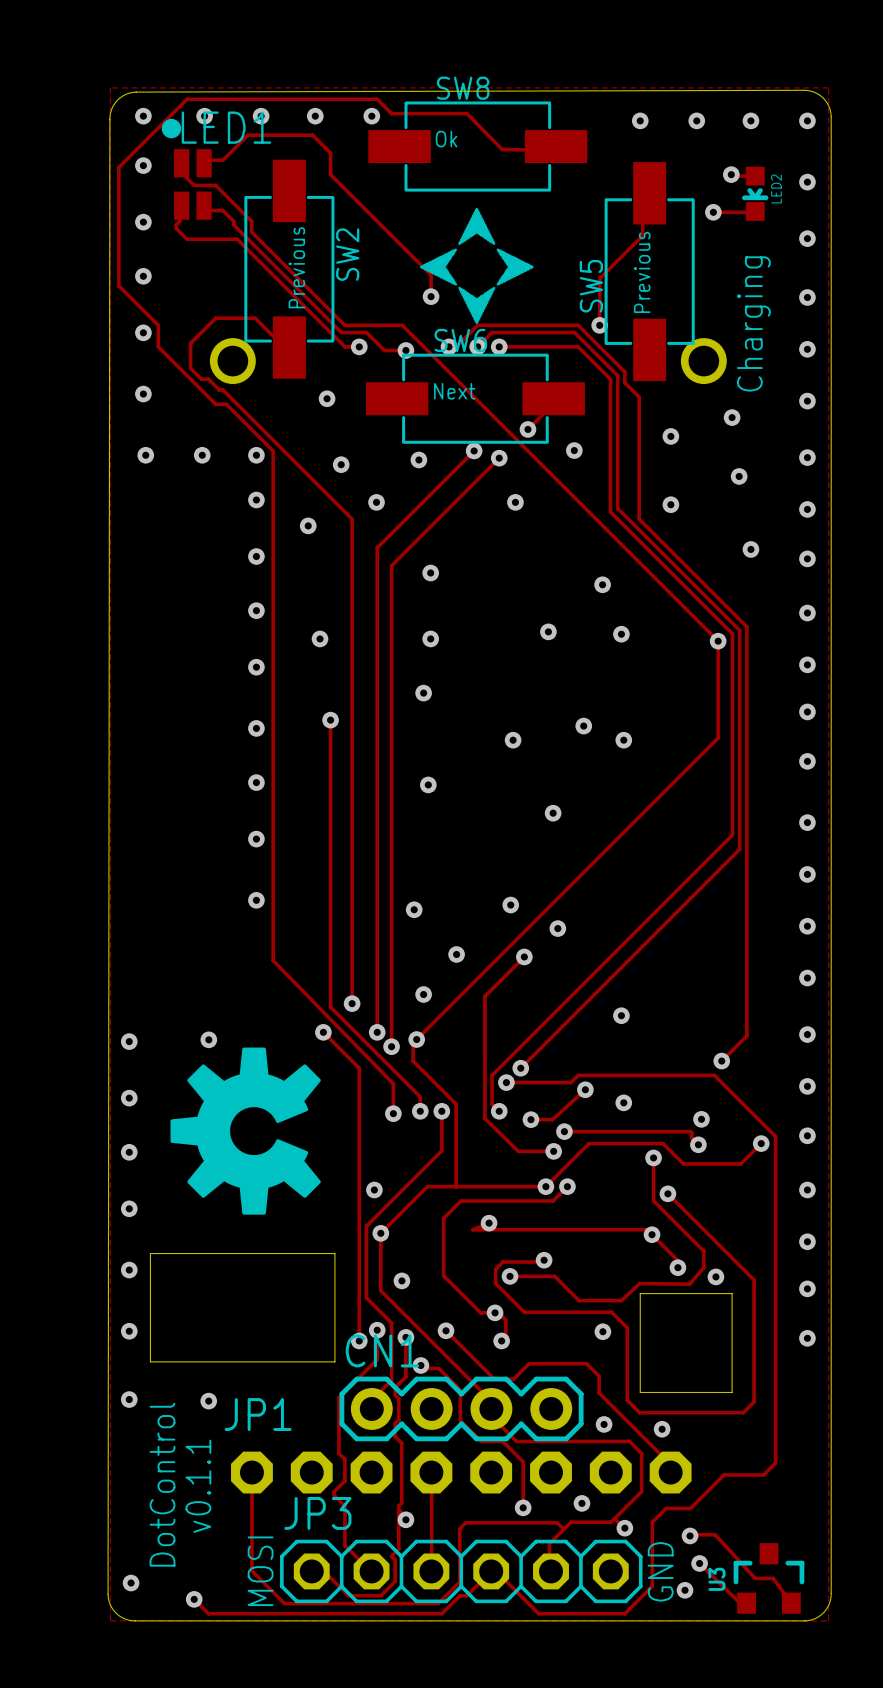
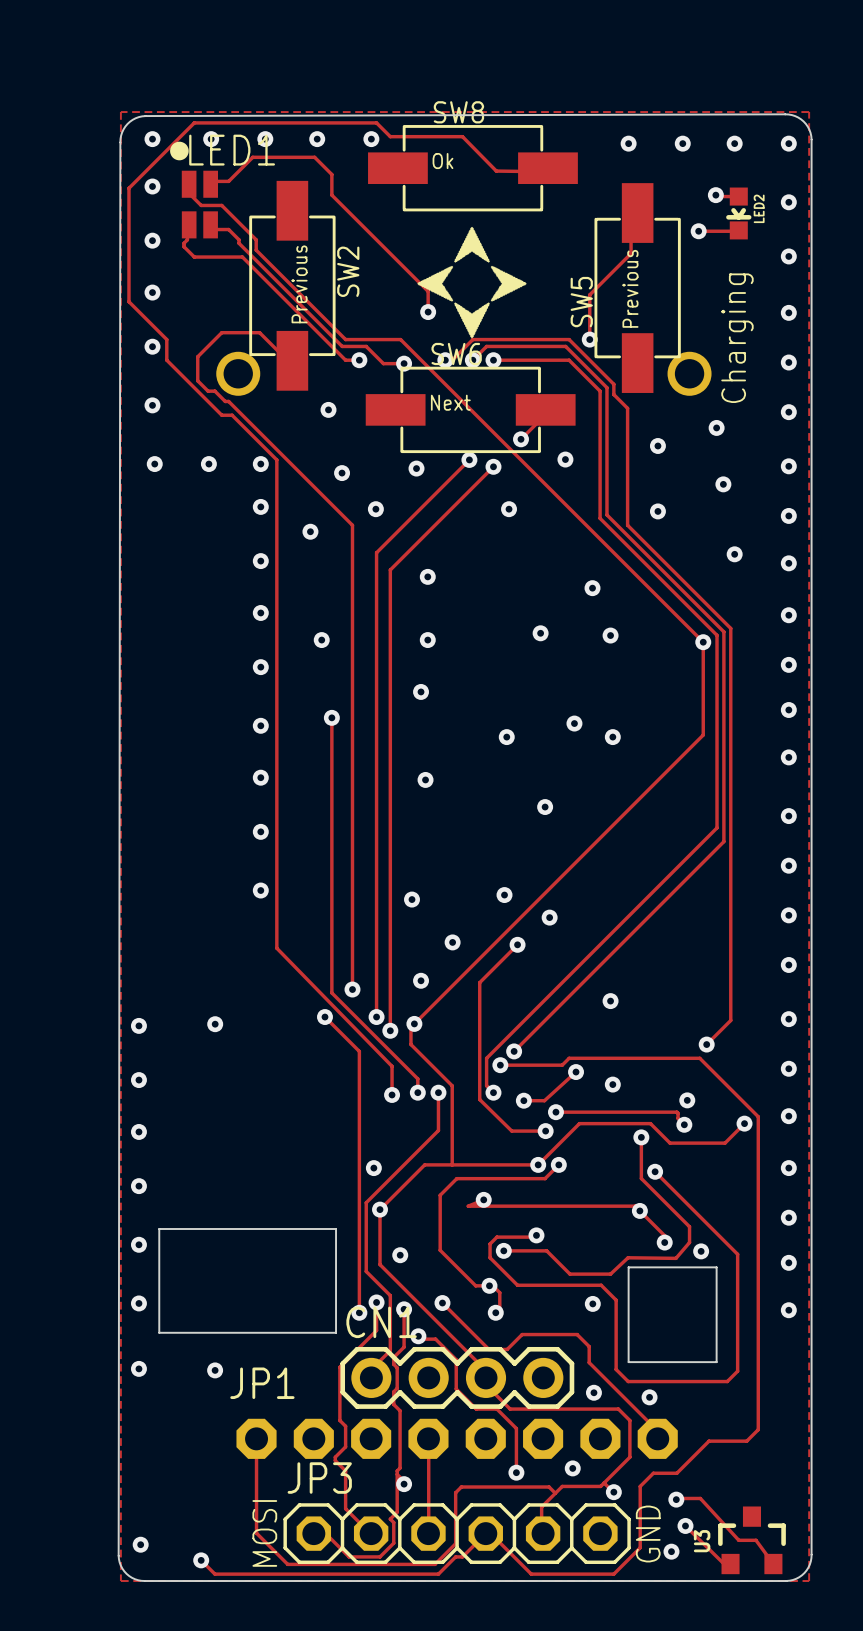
drawing: [170, 1047, 321, 1215] -> none
text: DotControl (162, 1484) -> none
text: v0.1.1 (198, 1486) -> none

